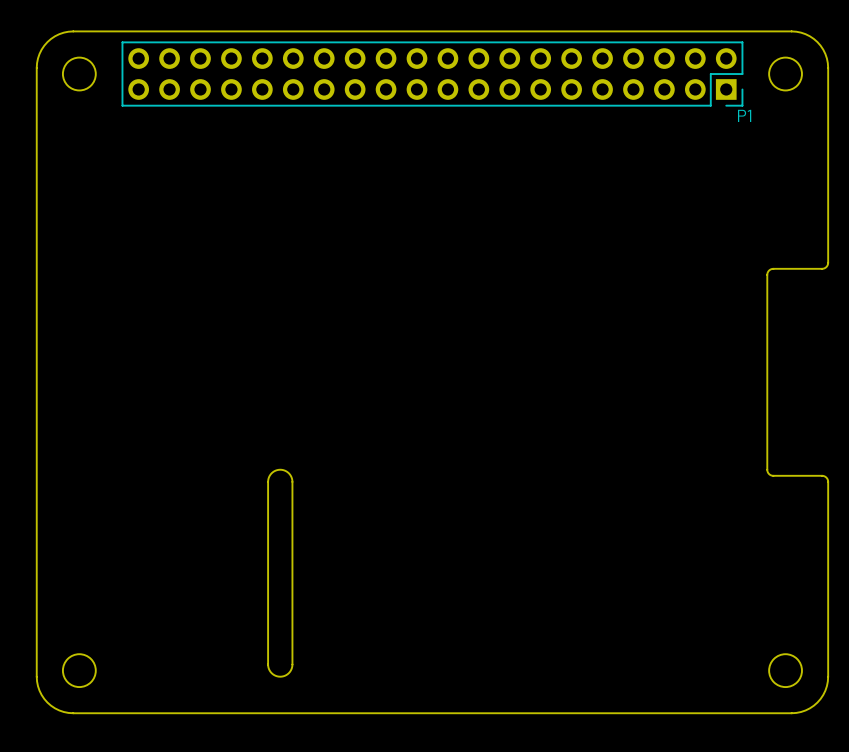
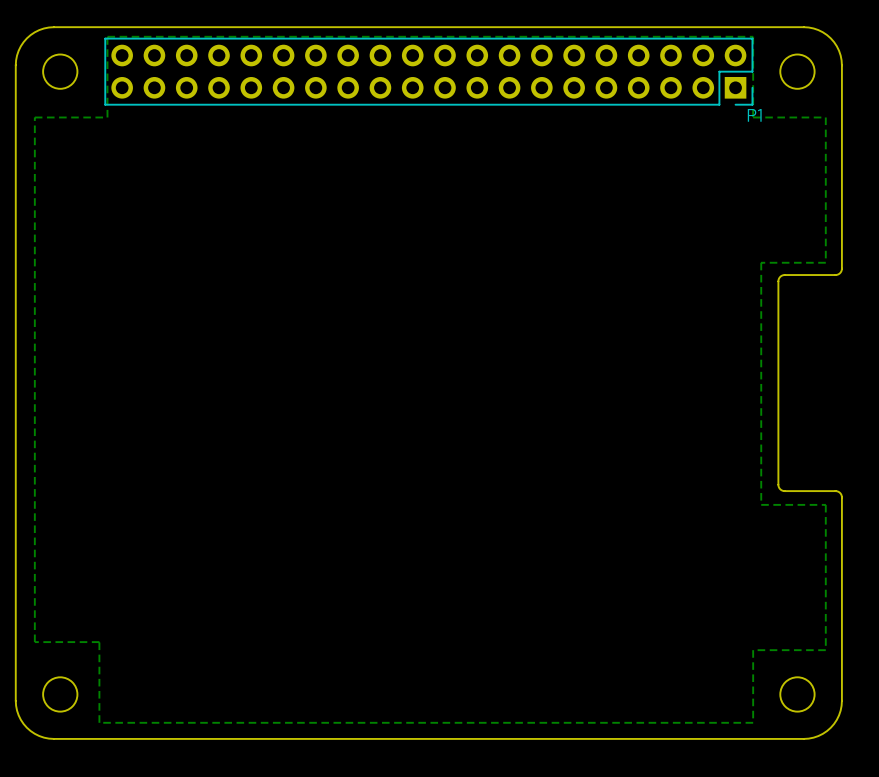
zone outline: none -> (753, 36) (753, 117) (825, 117) (825, 262) (761, 262) (761, 504) (825, 504) (825, 650) (753, 650) (753, 722) (99, 722) (99, 642) (34, 642) (34, 117) (107, 117) (107, 36) (753, 36)
board edge: (292, 481) (292, 666) (287, 674) (278, 676) (270, 671) (268, 664) (268, 480) (272, 472) (281, 469) (289, 474) (292, 481) -> none

